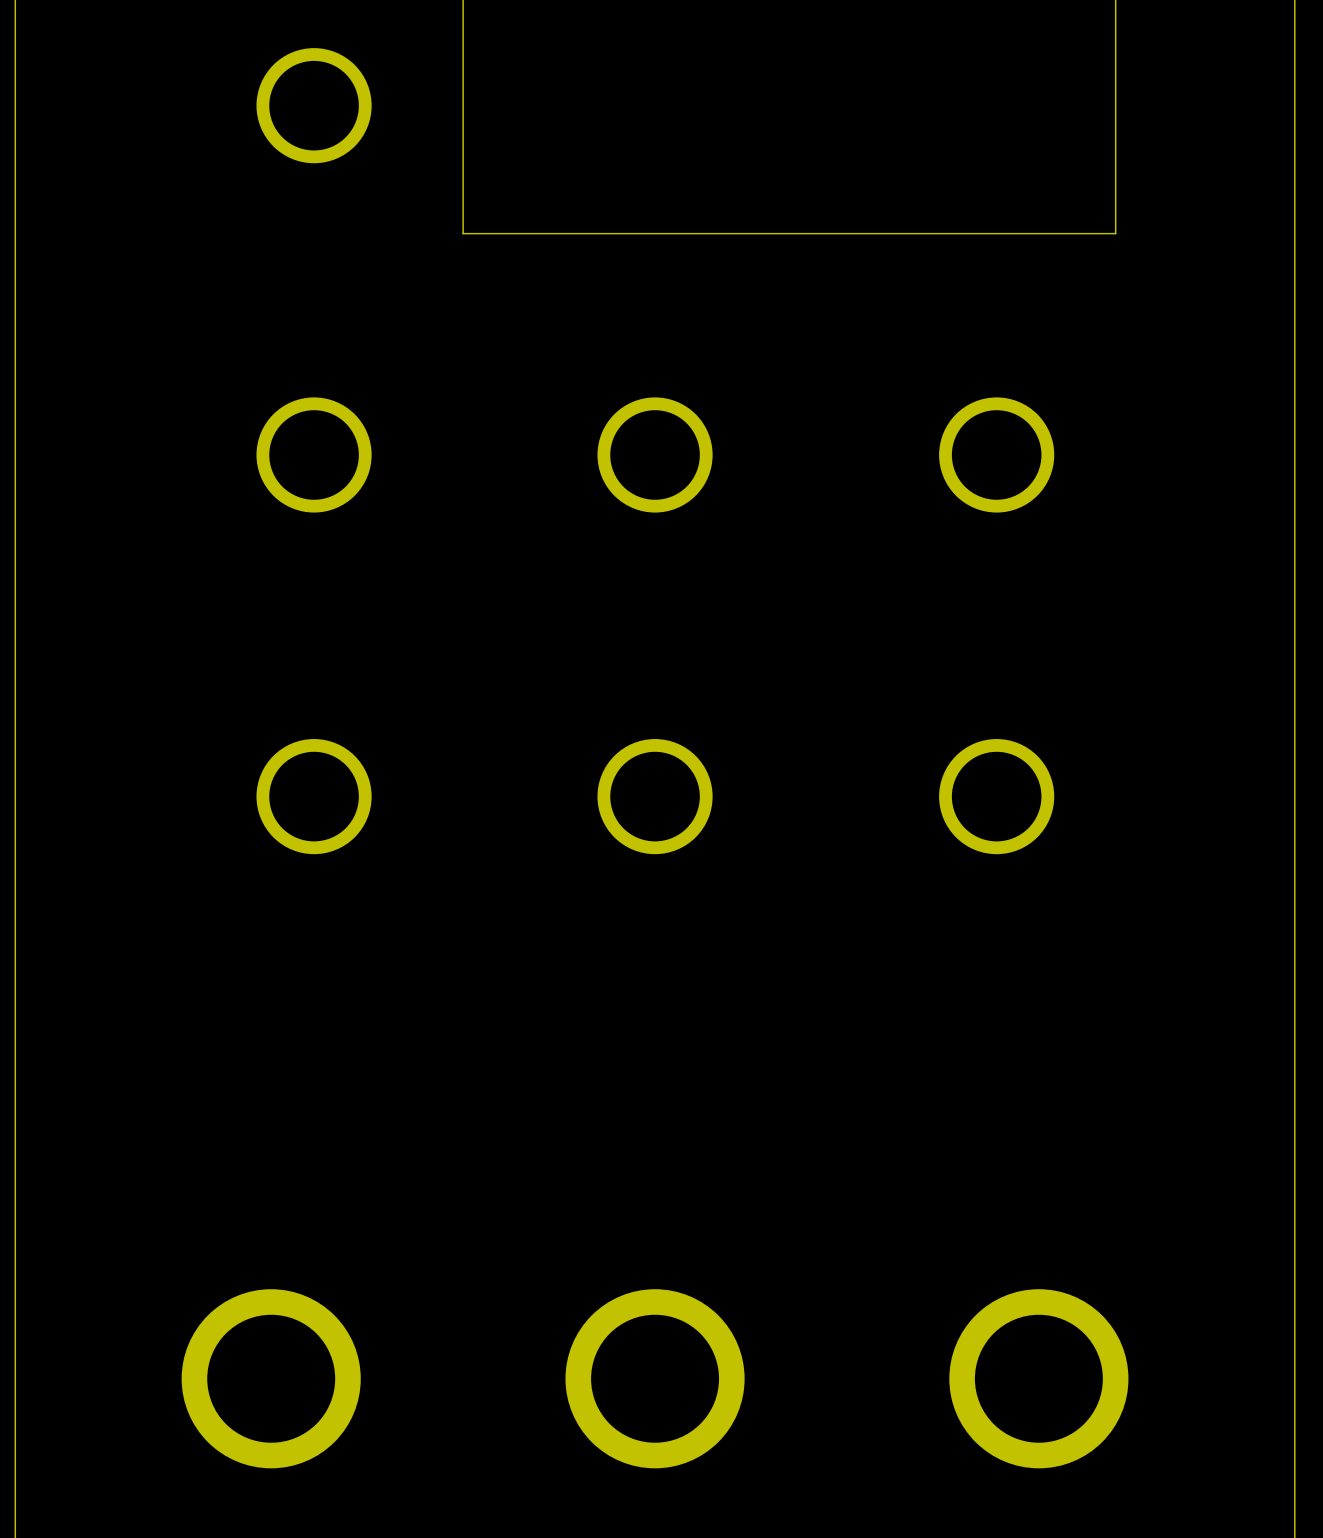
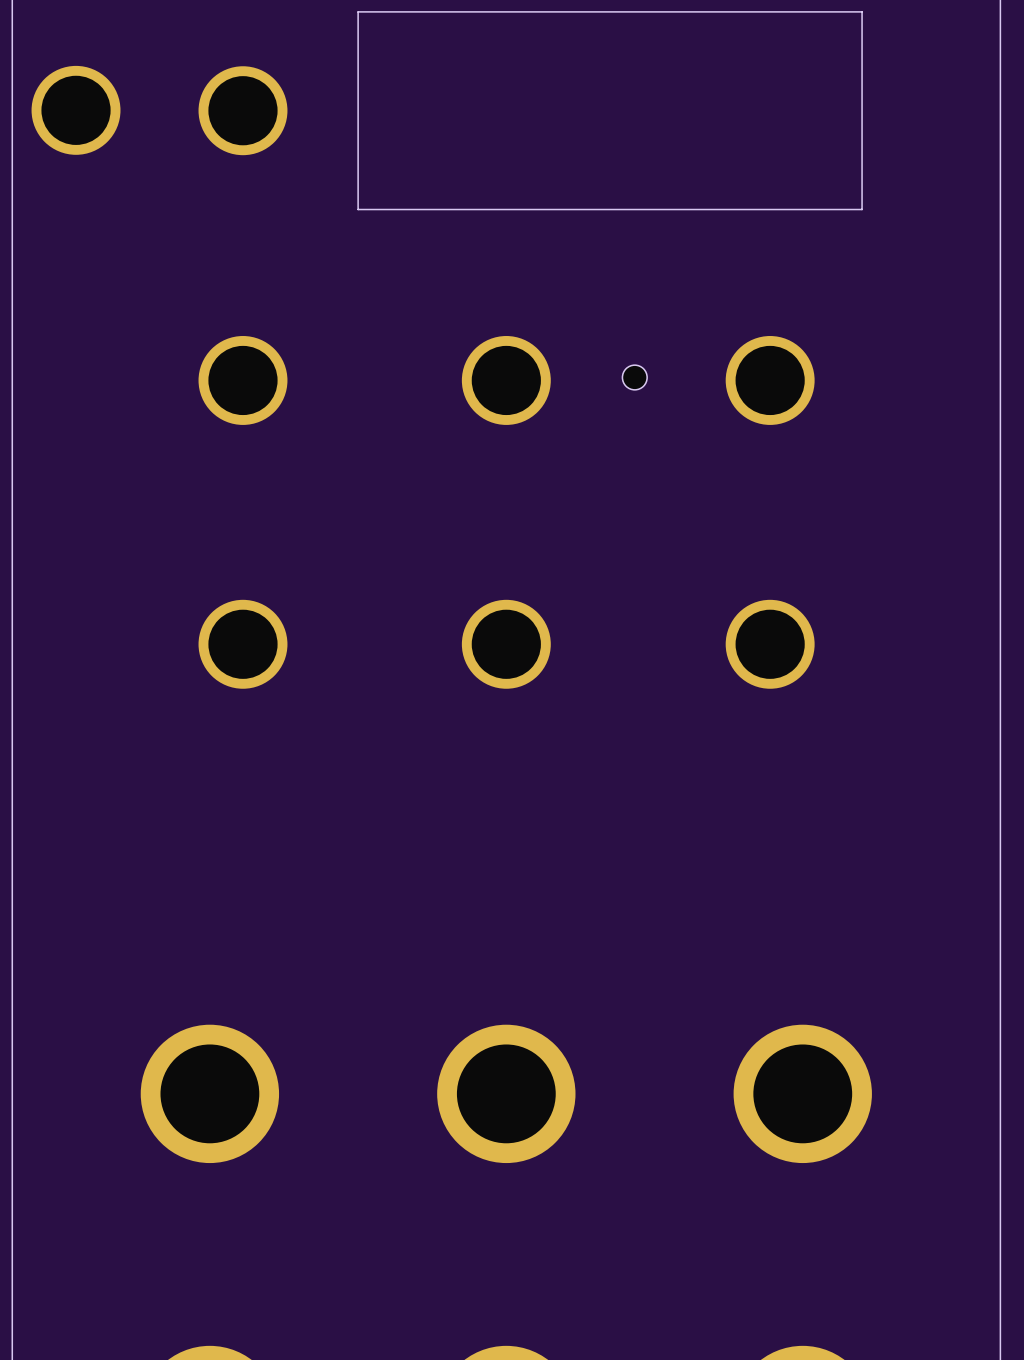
part: none -> (76, 110)
part: none -> (634, 377)

